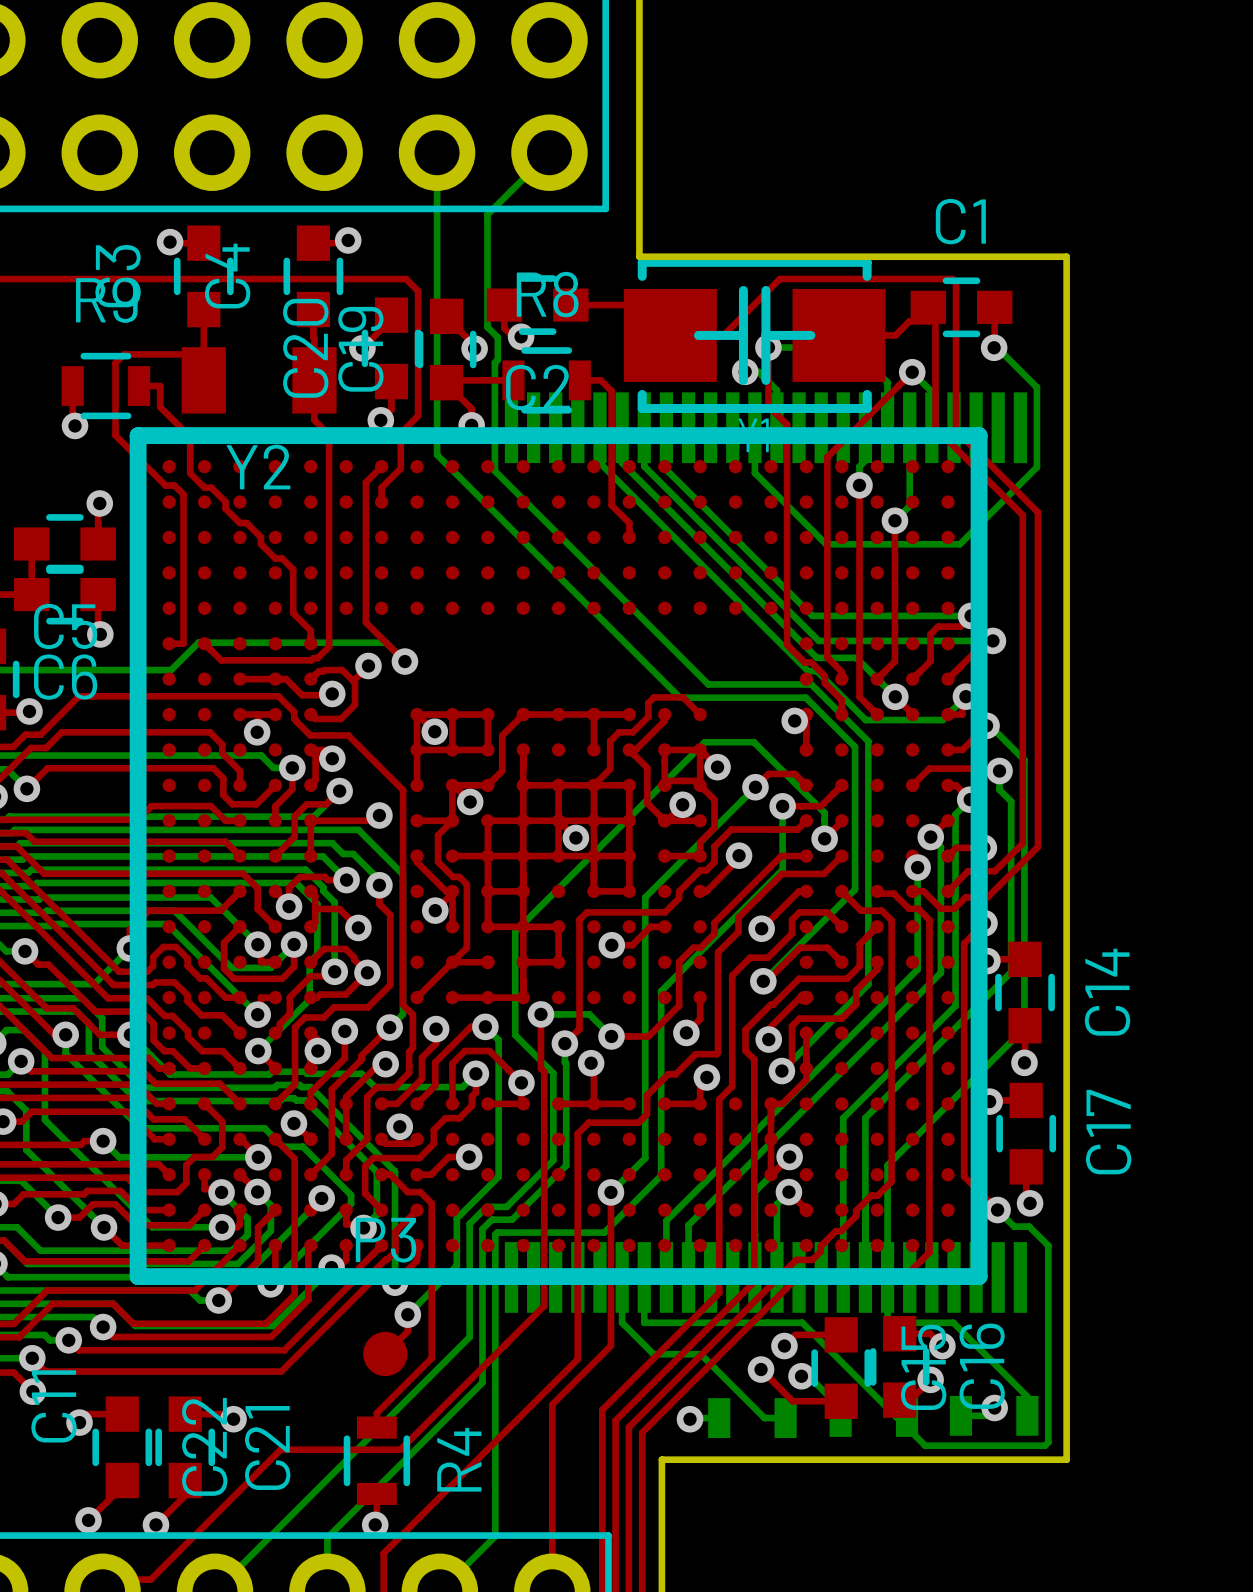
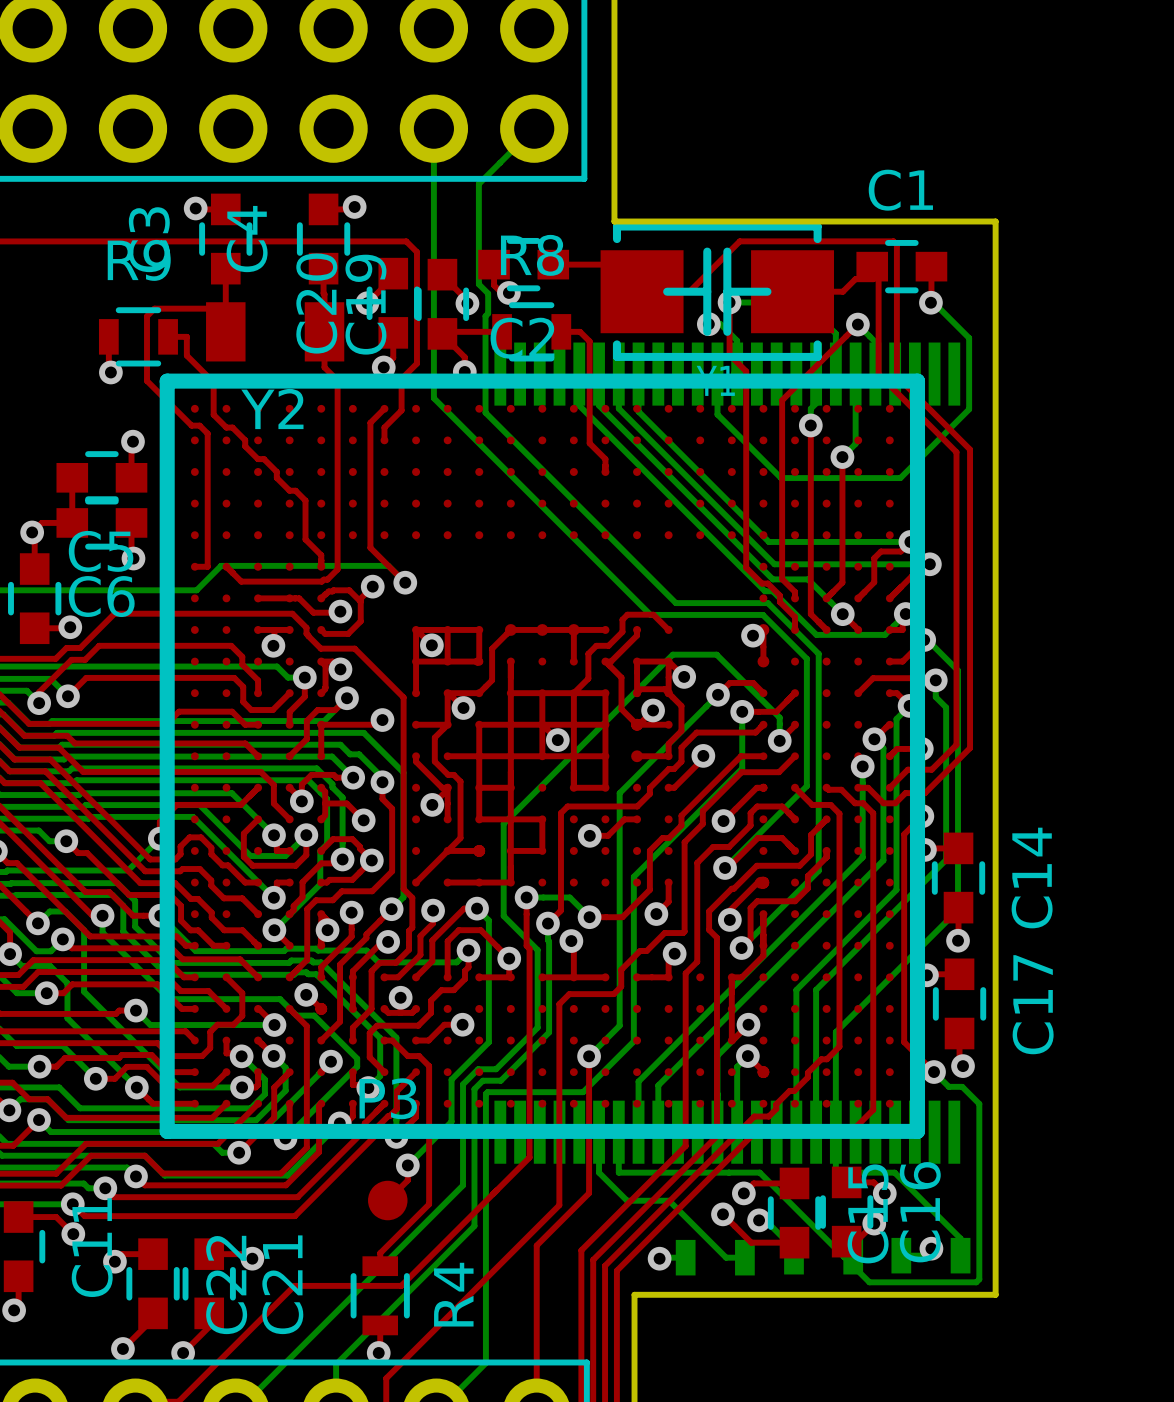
part footprint: [129, 427, 988, 1285] -> [159, 373, 926, 1139]

